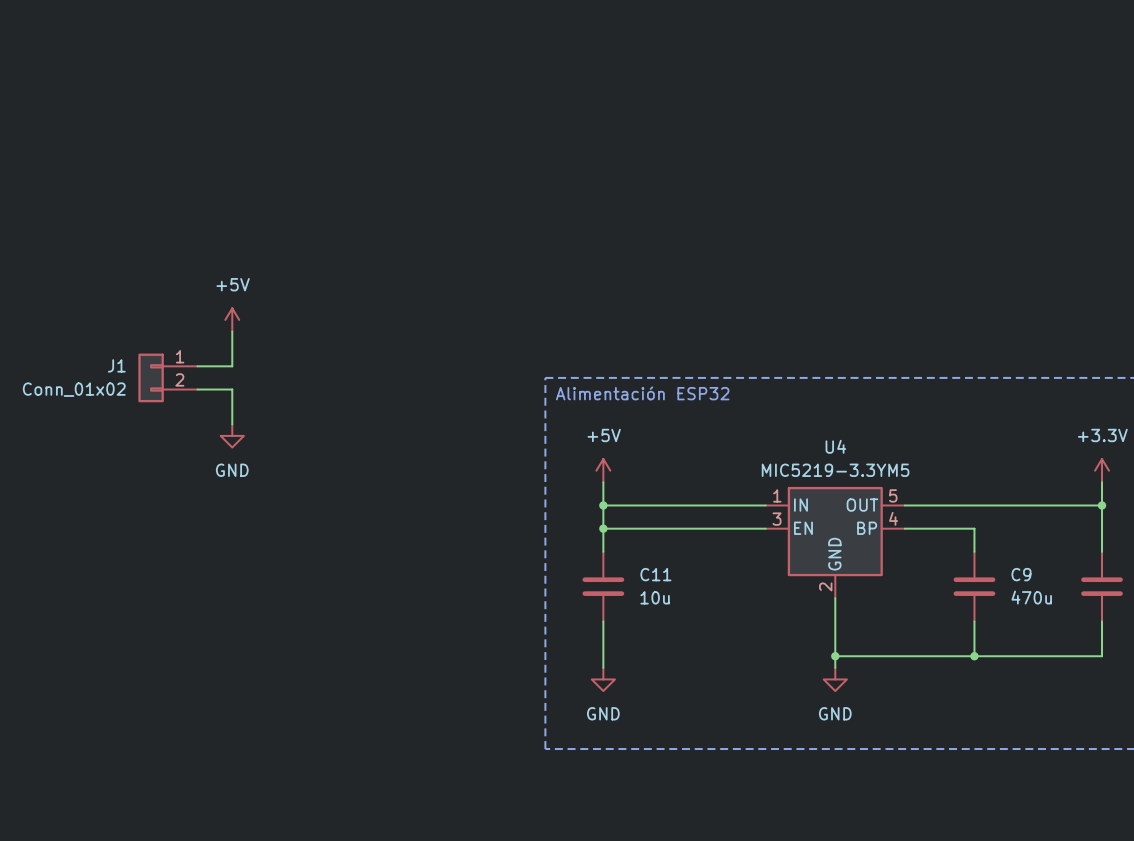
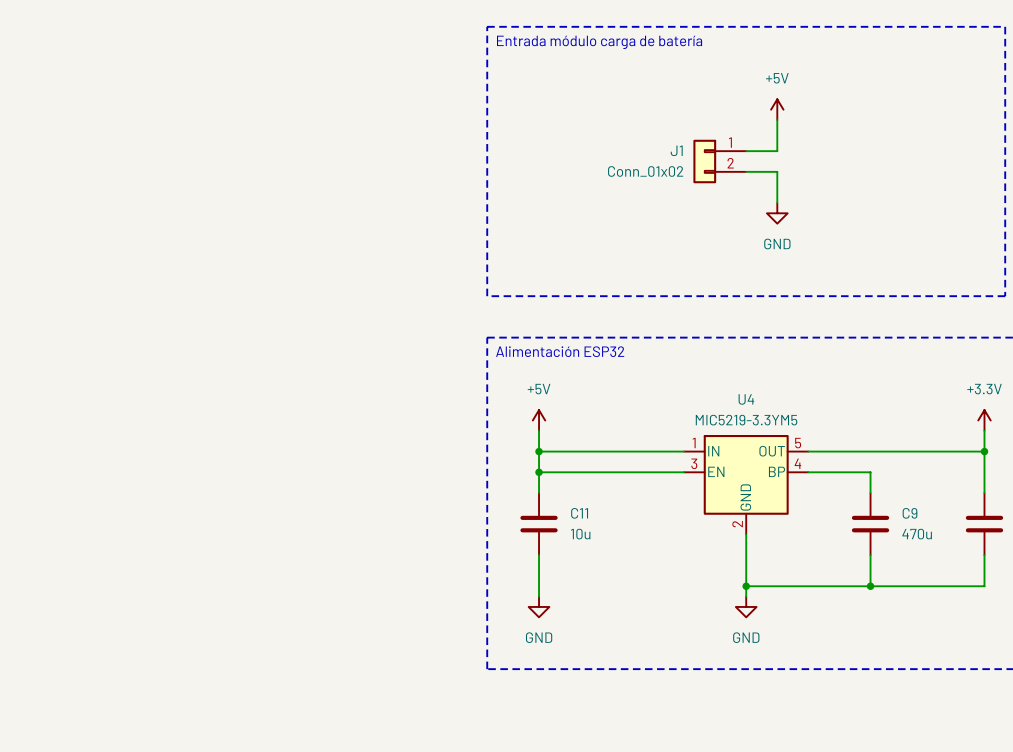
line: none -> (487, 26) (1005, 26) (1005, 296) (487, 296) (487, 26)
text: none -> Entrada módulo carga de batería (599, 42)
power symbol: none -> +5V (777, 109)
wire: none -> (777, 120) (777, 151) (746, 151)
wire: none -> (746, 171) (777, 171) (777, 202)
power symbol: none -> GND (777, 213)
power symbol: +5V (232, 319) -> none
wire: (232, 331) (232, 366) (197, 366) -> none
J1 position: (167, 377) -> (719, 161)
wire: (197, 389) (232, 389) (232, 424) -> none
power symbol: GND (232, 435) -> none

